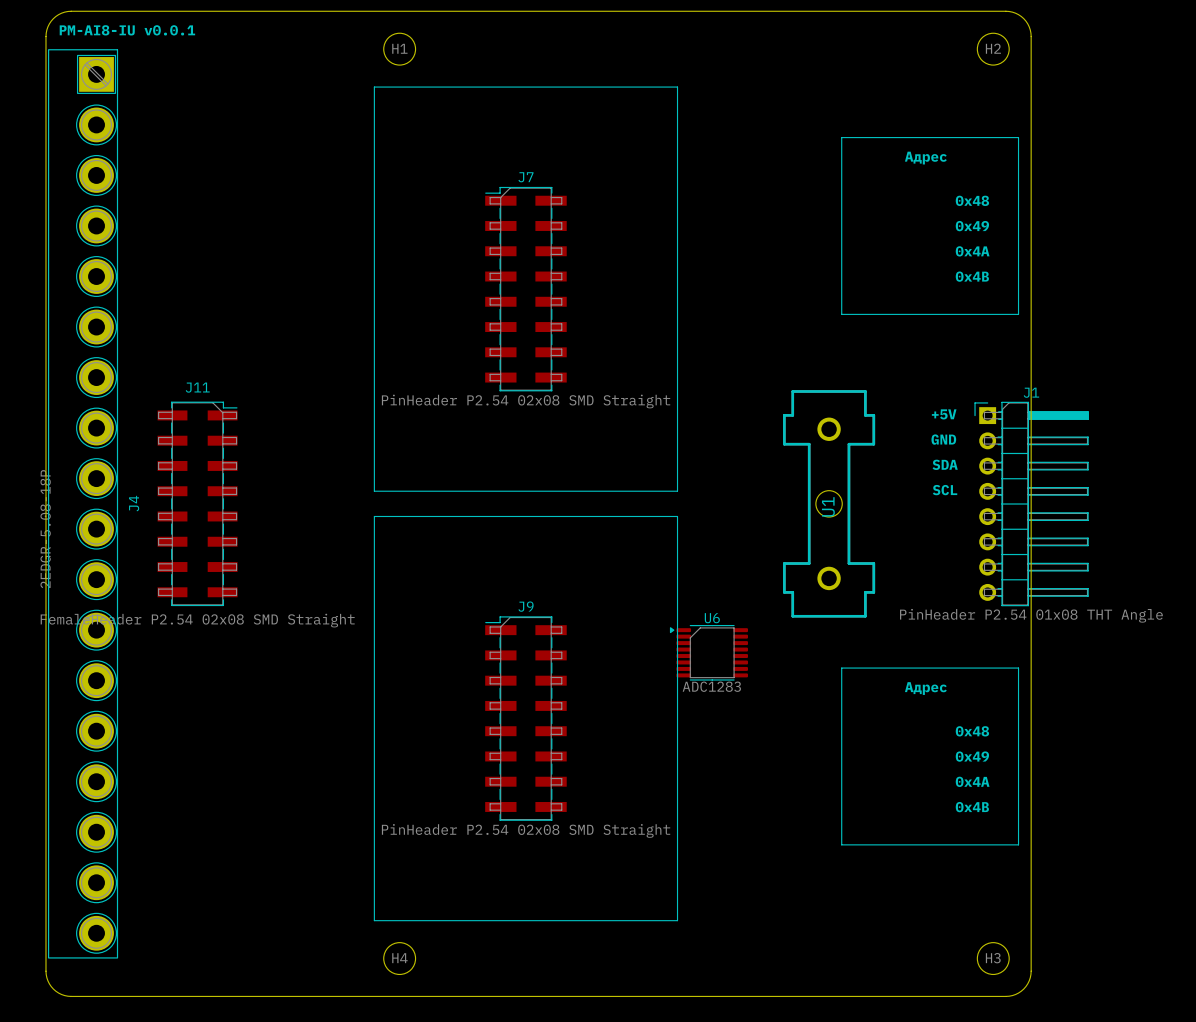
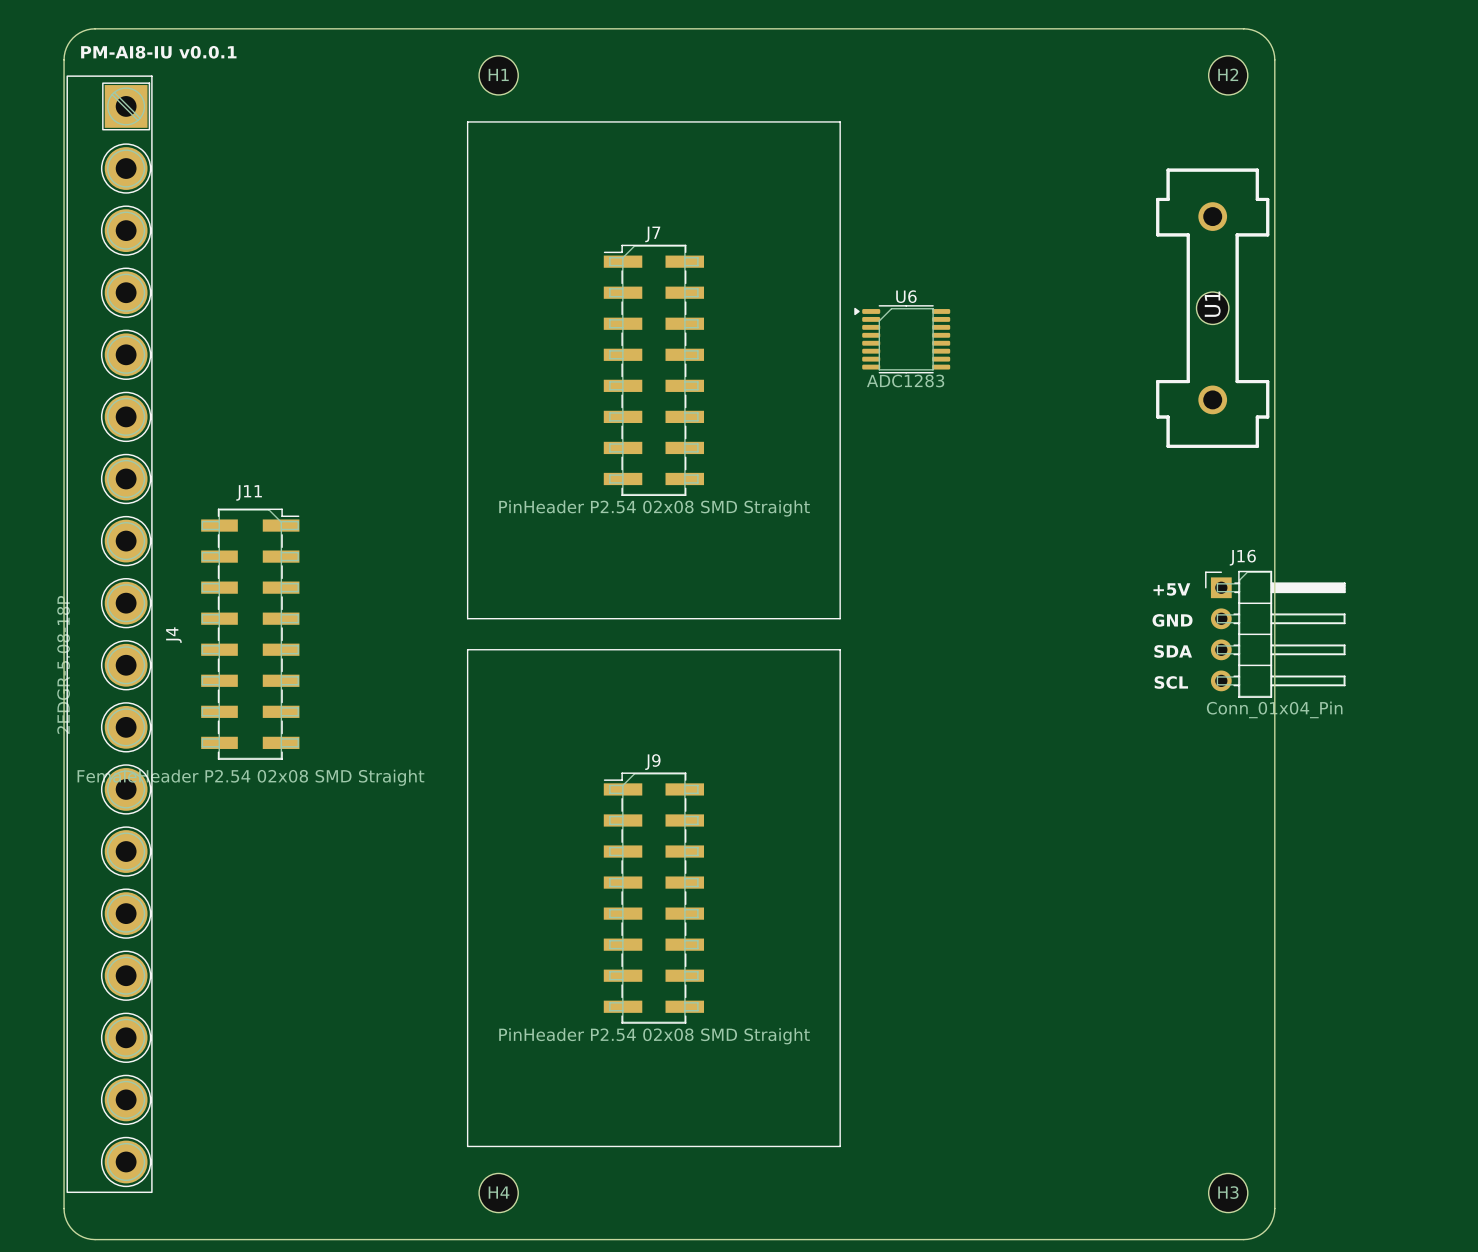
line: (841, 137) (841, 314) (1018, 314) (1018, 137) (841, 137) -> none
text: Адрес (925, 158) -> none
text: 0x48 (972, 200) -> none
text: 0x49 (972, 226) -> none
text: 0x4A (972, 251) -> none
text: 0x4B (972, 276) -> none
text position: +5V (944, 414) -> +5V (1171, 589)
text position: GND (943, 439) -> GND (1172, 620)
text position: SDA (945, 464) -> SDA (1173, 651)
text position: SCL (945, 490) -> SCL (1171, 682)
U1 position: (829, 503) -> (1212, 308)
J16: none -> Conn_01x04_Pin (1275, 634)
J1: PinHeader P2.54 01x08 THT Angle (1031, 504) -> none
U1 name position: U1 (828, 506) -> U1 (1212, 304)
U6 position: (708, 652) -> (902, 339)
line: (841, 668) (1018, 668) (1018, 844) (841, 844) (841, 668) -> none
text: Адрес (925, 688) -> none
text: 0x48 (972, 731) -> none
text: 0x49 (972, 756) -> none
text: 0x4A (972, 781) -> none
text: 0x4B (972, 807) -> none

